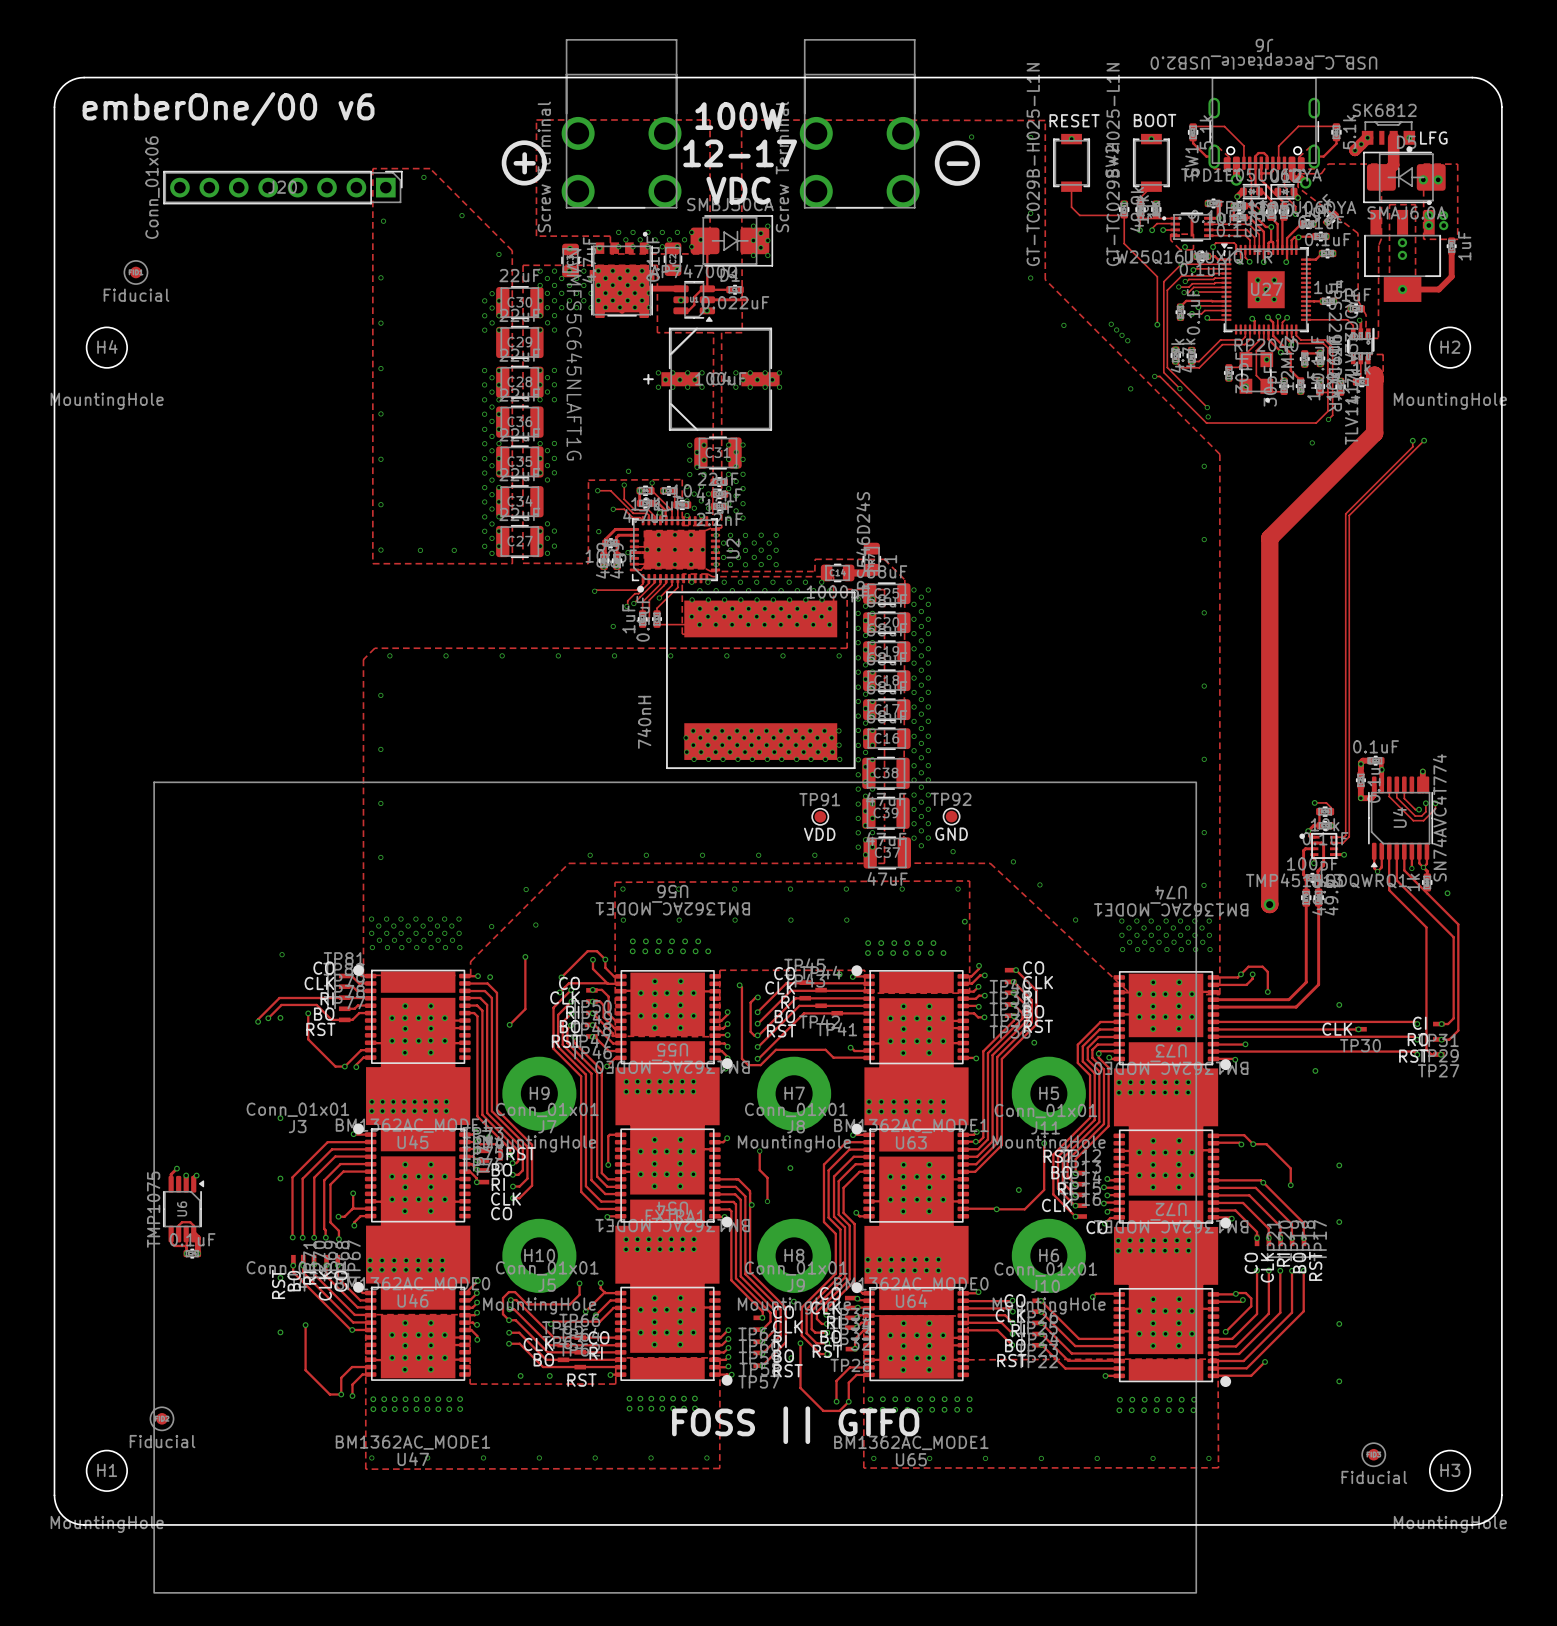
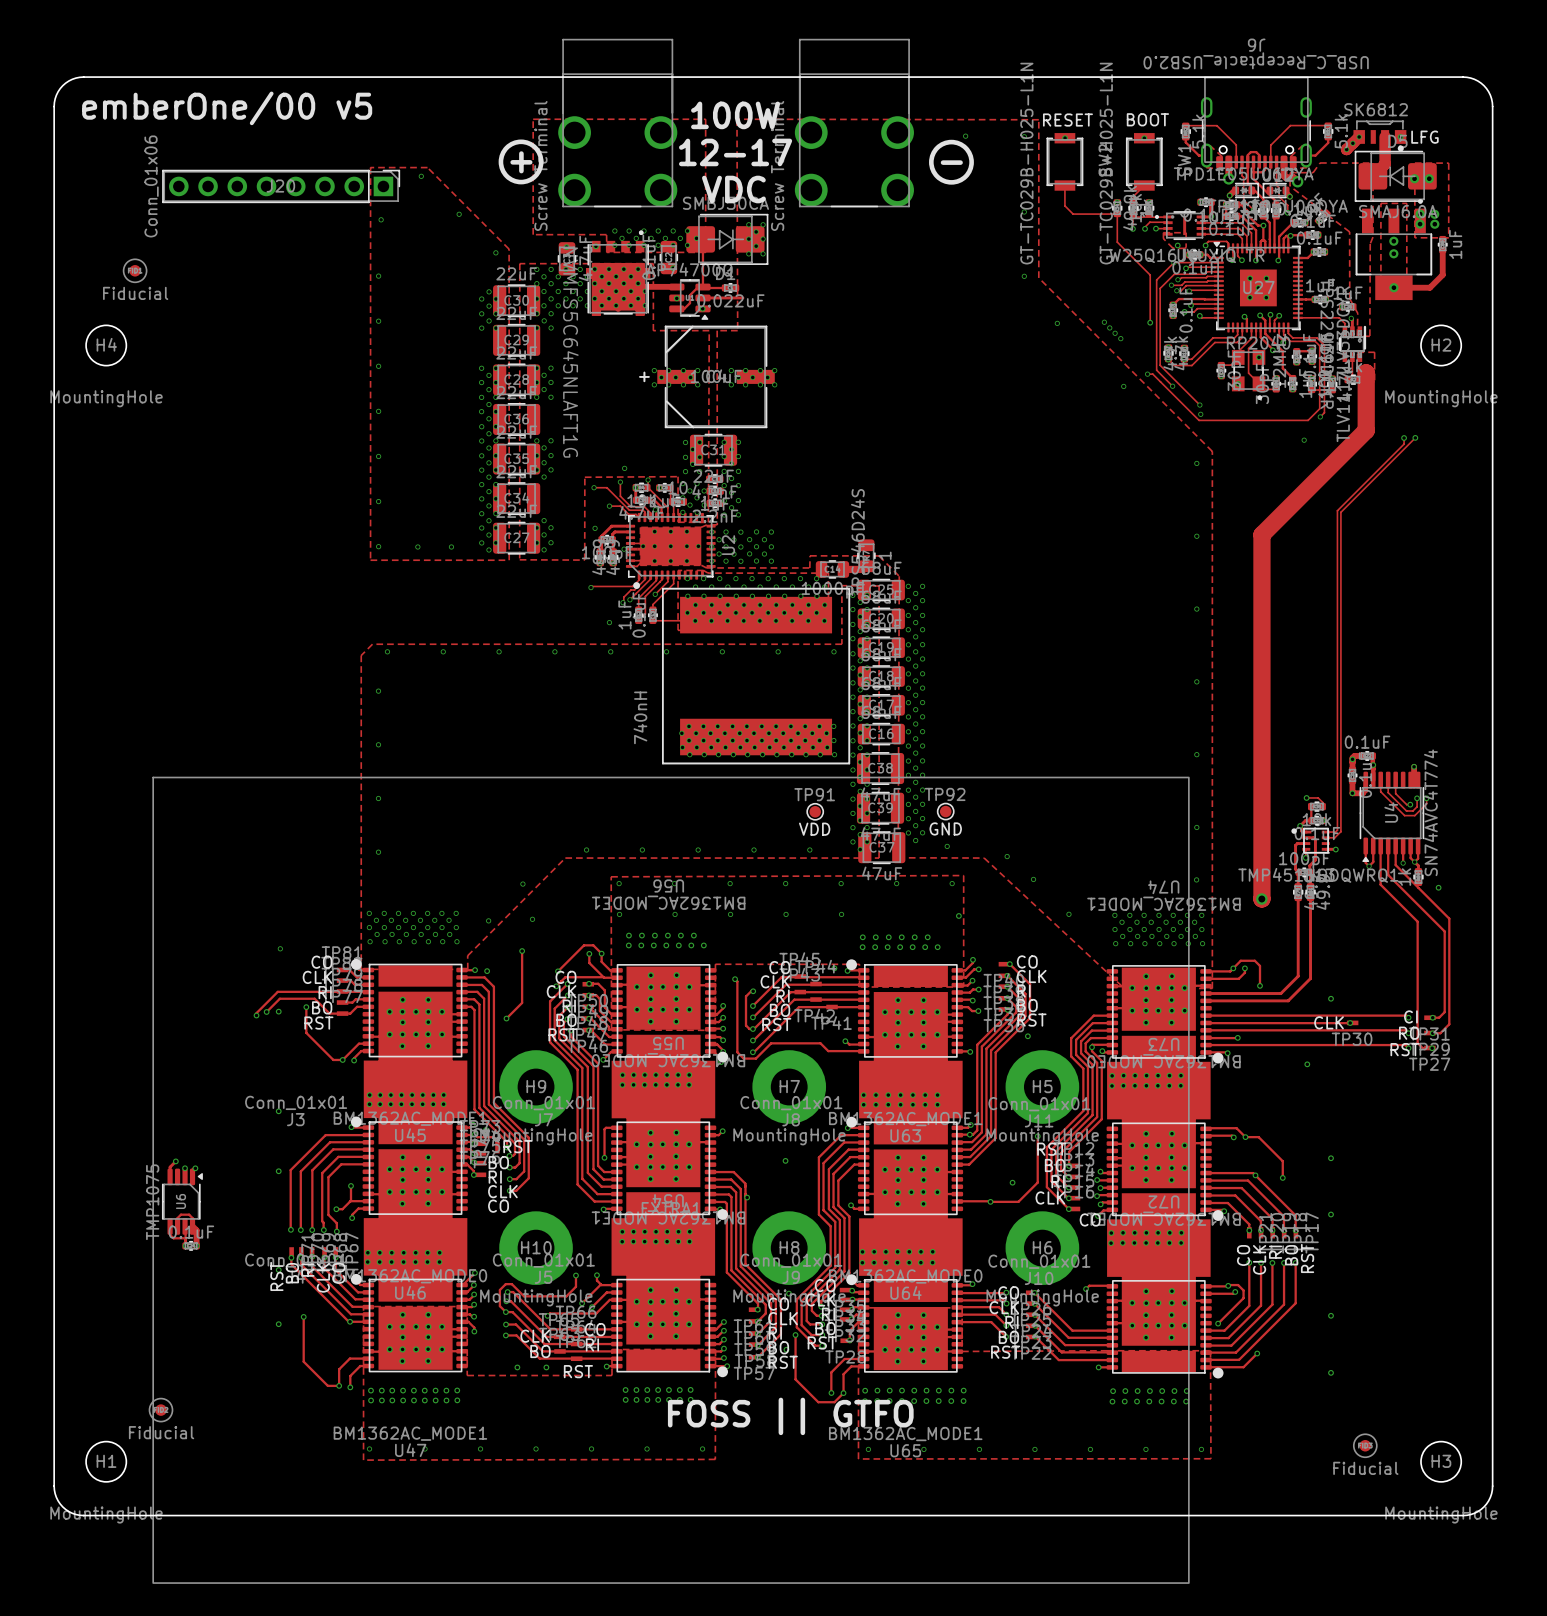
text: emberOne/00 v6 (228, 109) -> emberOne/00 v5 (227, 108)
track: (759, 1151) (759, 1170) (767, 1177) (767, 1201) -> none
via: (759, 1151) -> none
via: (767, 1201) -> none

